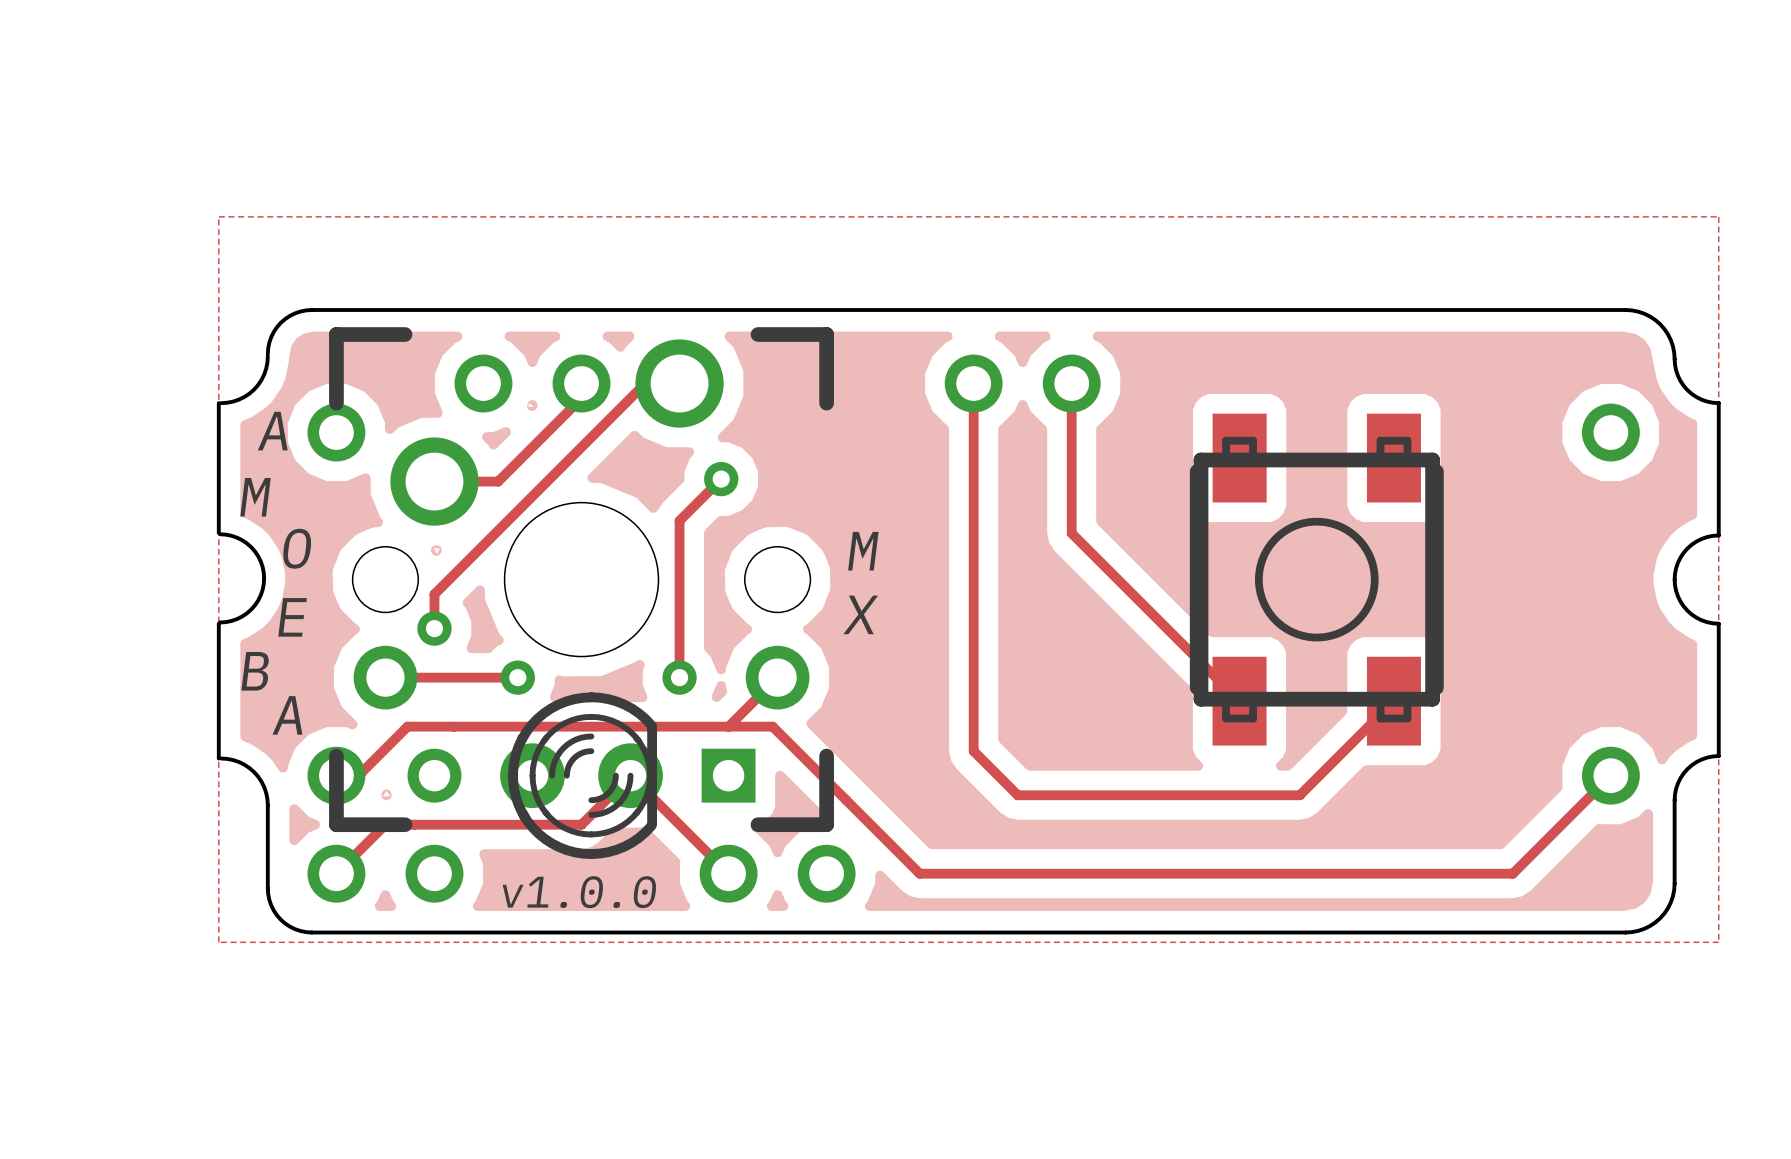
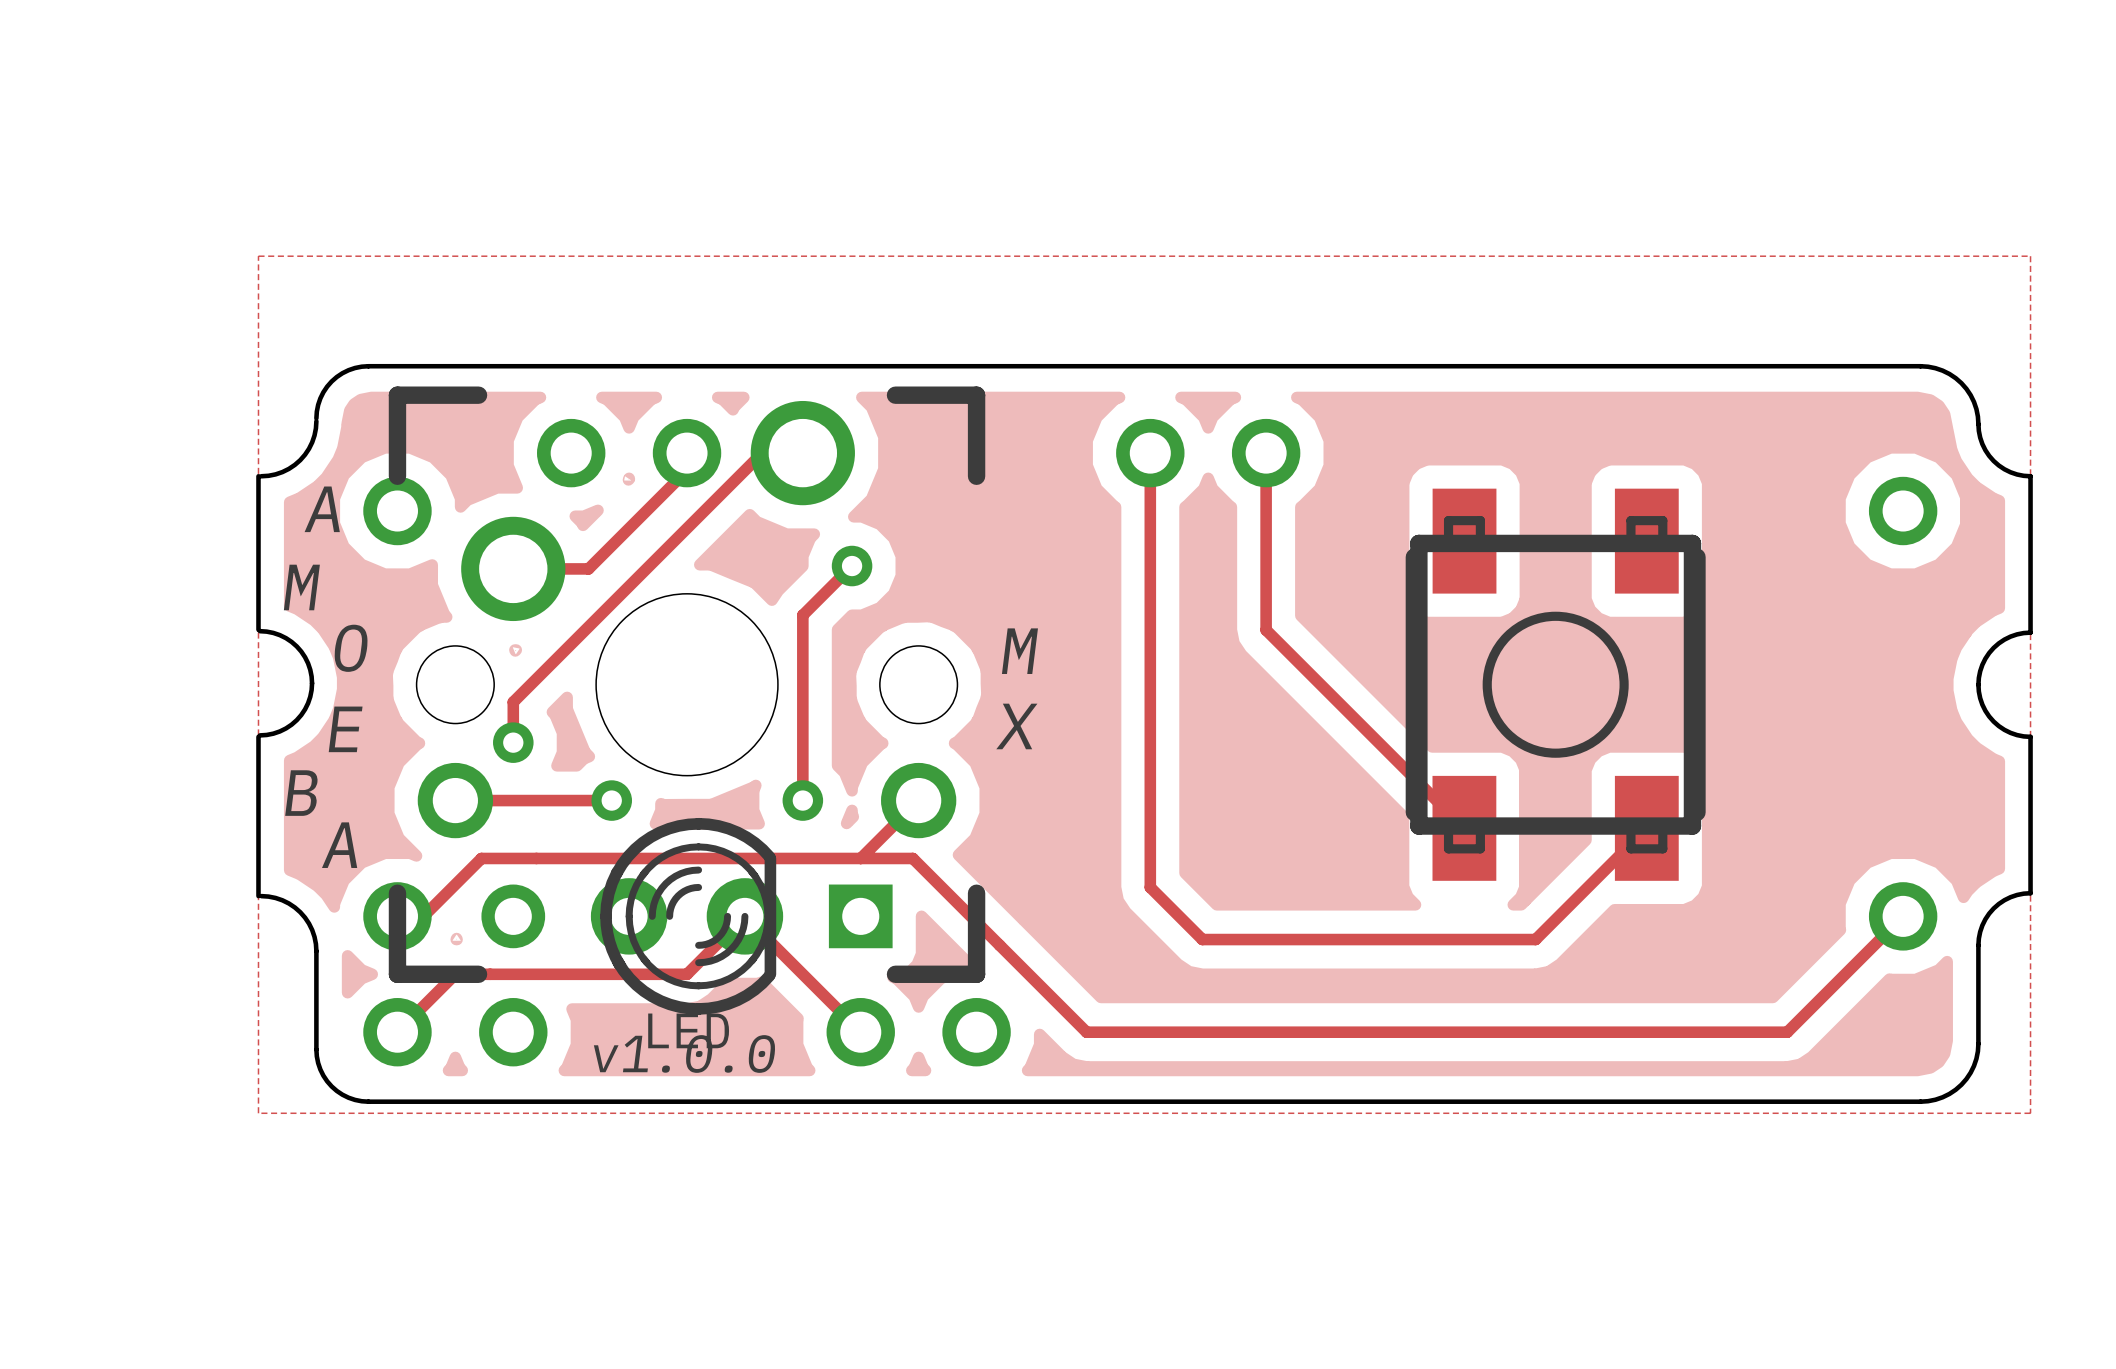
part value: none -> LED (688, 1030)

